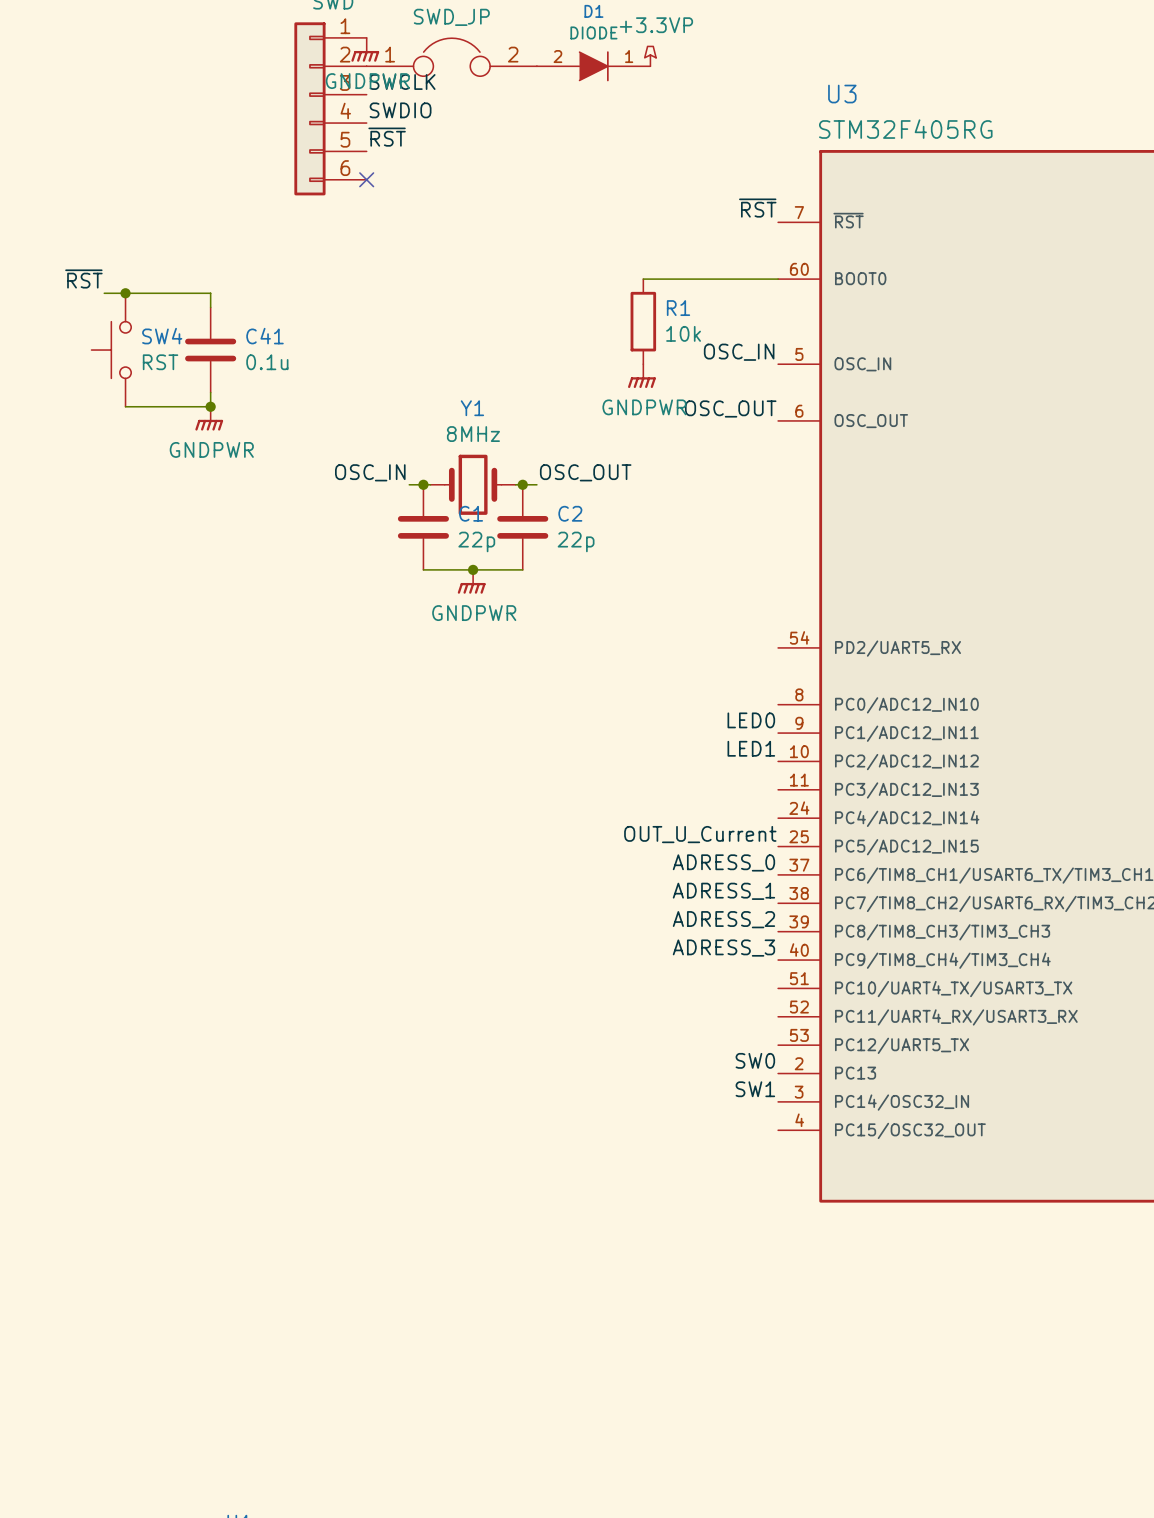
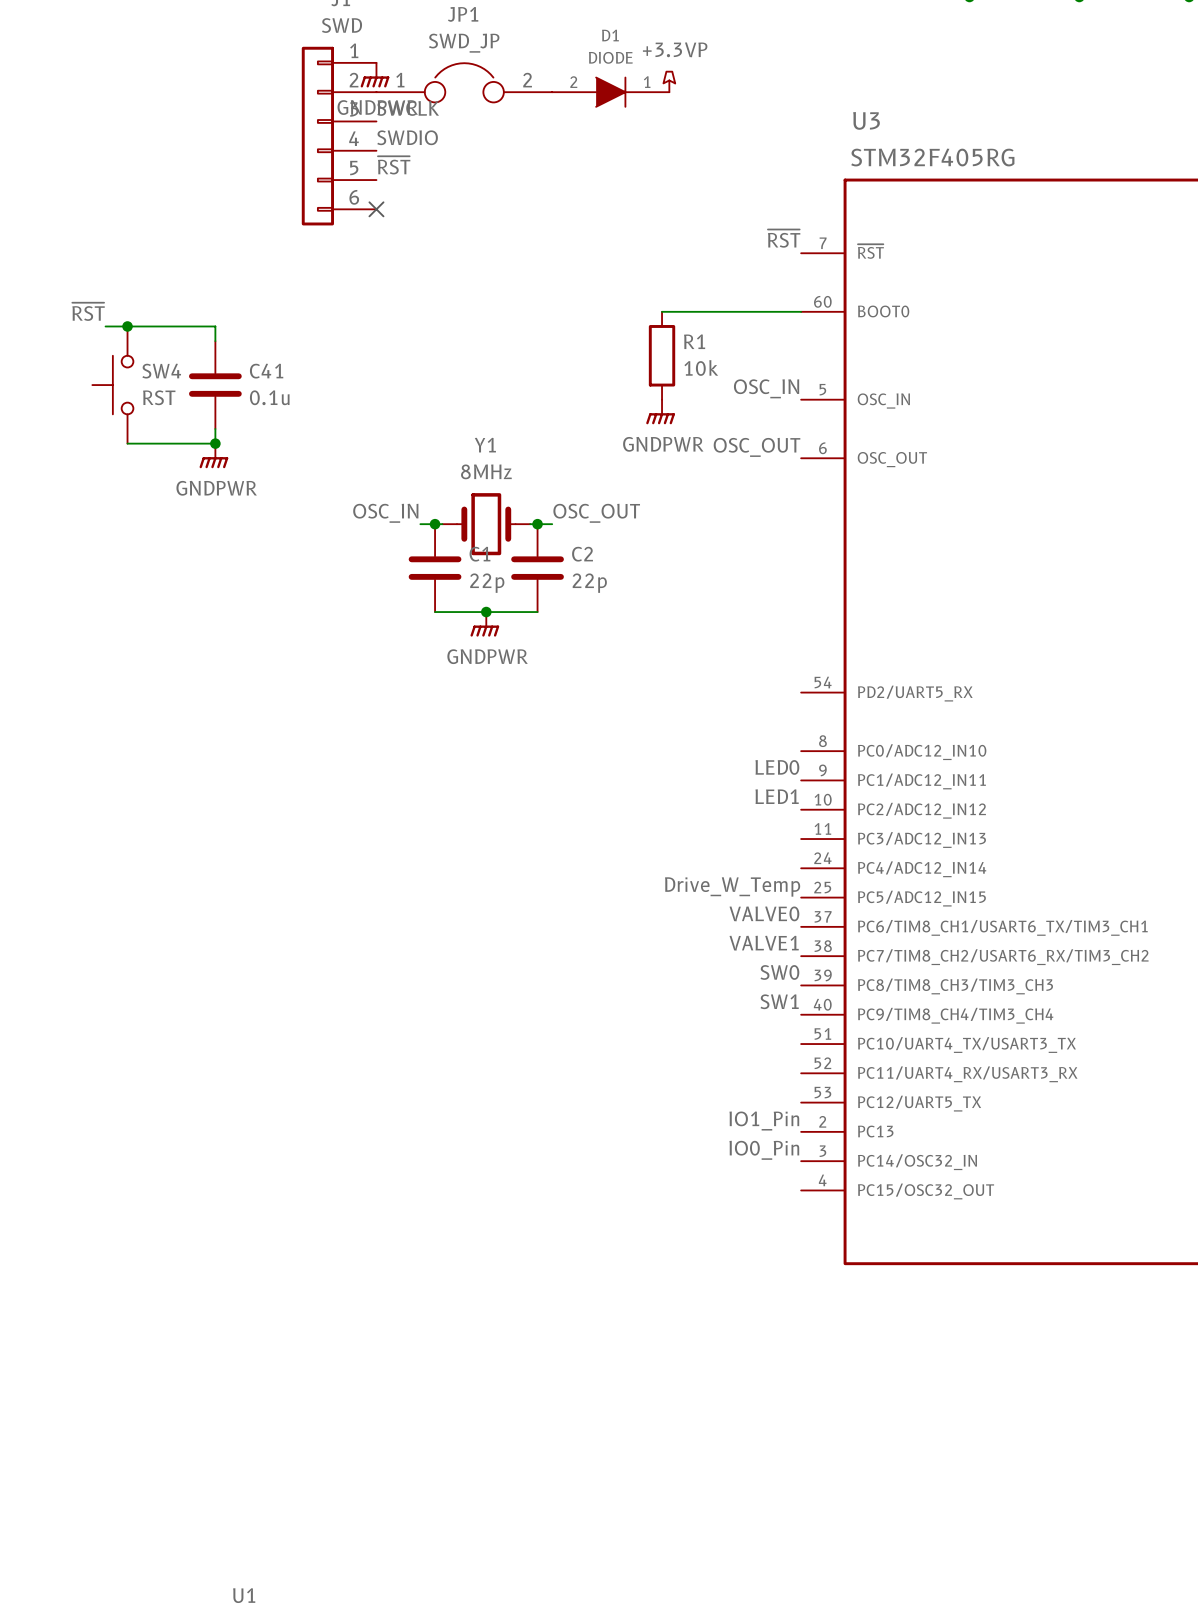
label: OUT_U_Current (700, 834) -> Drive_W_Temp (732, 886)
label: ADRESS_0 (723, 862) -> VALVE0 (764, 913)
label: ADRESS_1 (723, 891) -> VALVE1 (764, 943)
label: ADRESS_2 (723, 919) -> SW0 (779, 972)
label: ADRESS_3 (723, 948) -> SW1 (779, 1001)
label: SW0 (755, 1060) -> IO1_Pin (764, 1121)
label: SW1 (755, 1089) -> IO0_Pin (764, 1150)

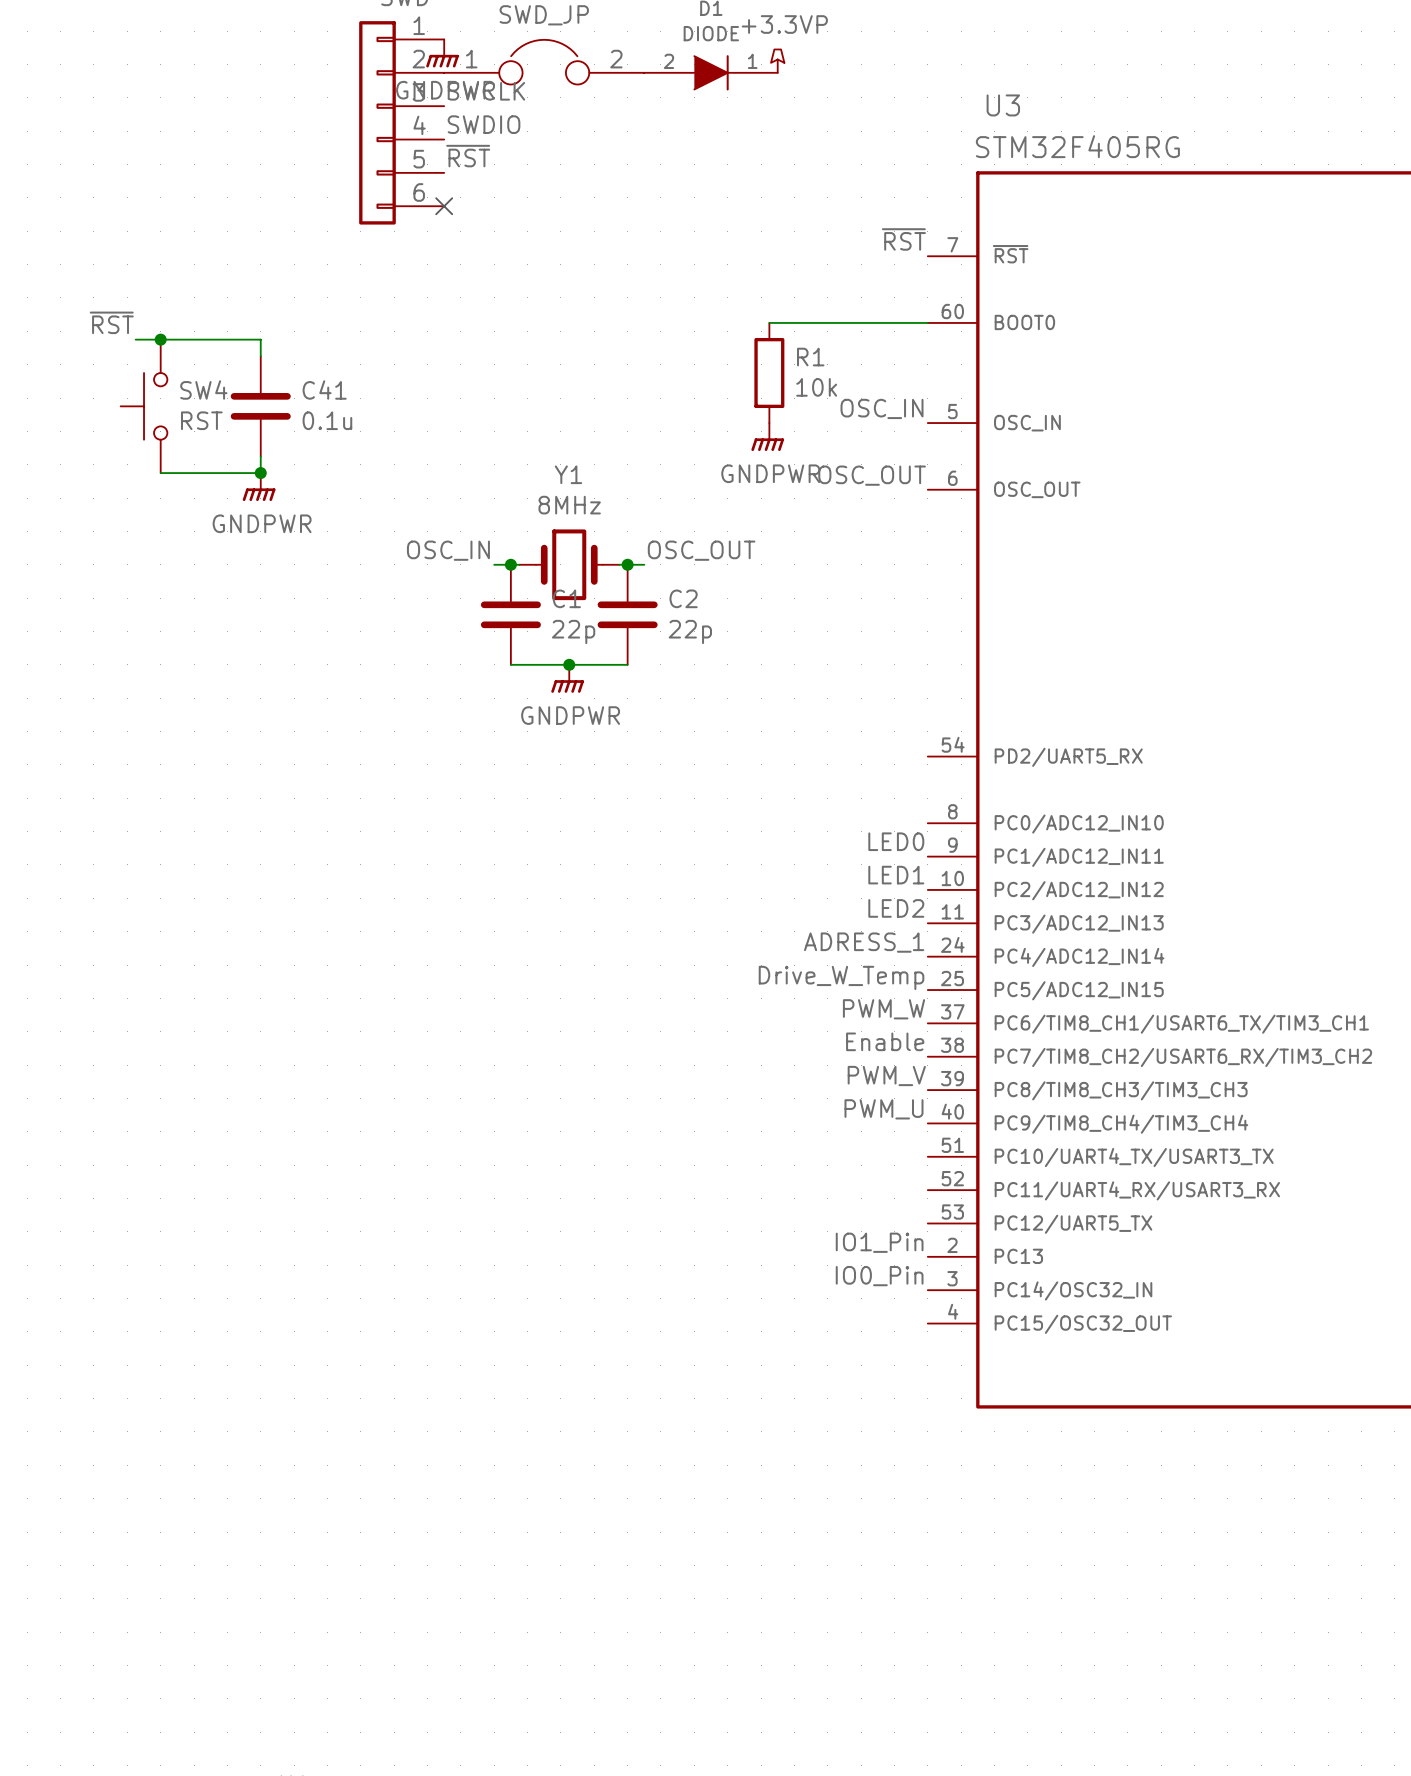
label: none -> LED2 (896, 908)
label: none -> ADRESS_1 (864, 942)
label: VALVE0 (764, 913) -> PWM_W (884, 1009)
label: VALVE1 (764, 943) -> Enable (885, 1041)
label: SW0 (779, 972) -> PWM_V (886, 1075)
label: SW1 (779, 1001) -> PWM_U (884, 1109)

